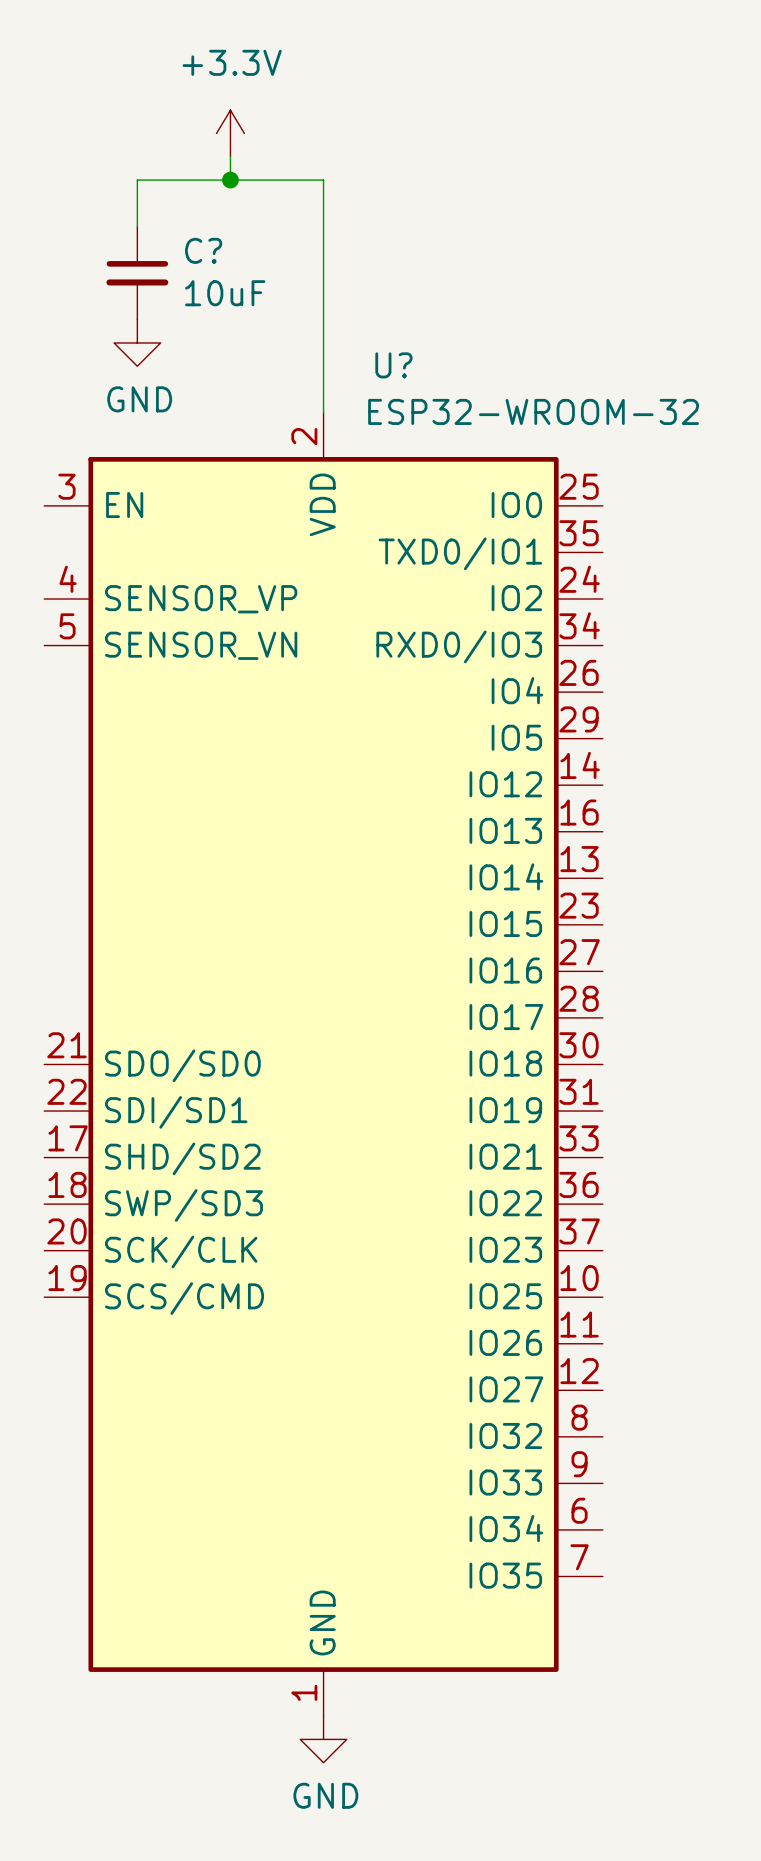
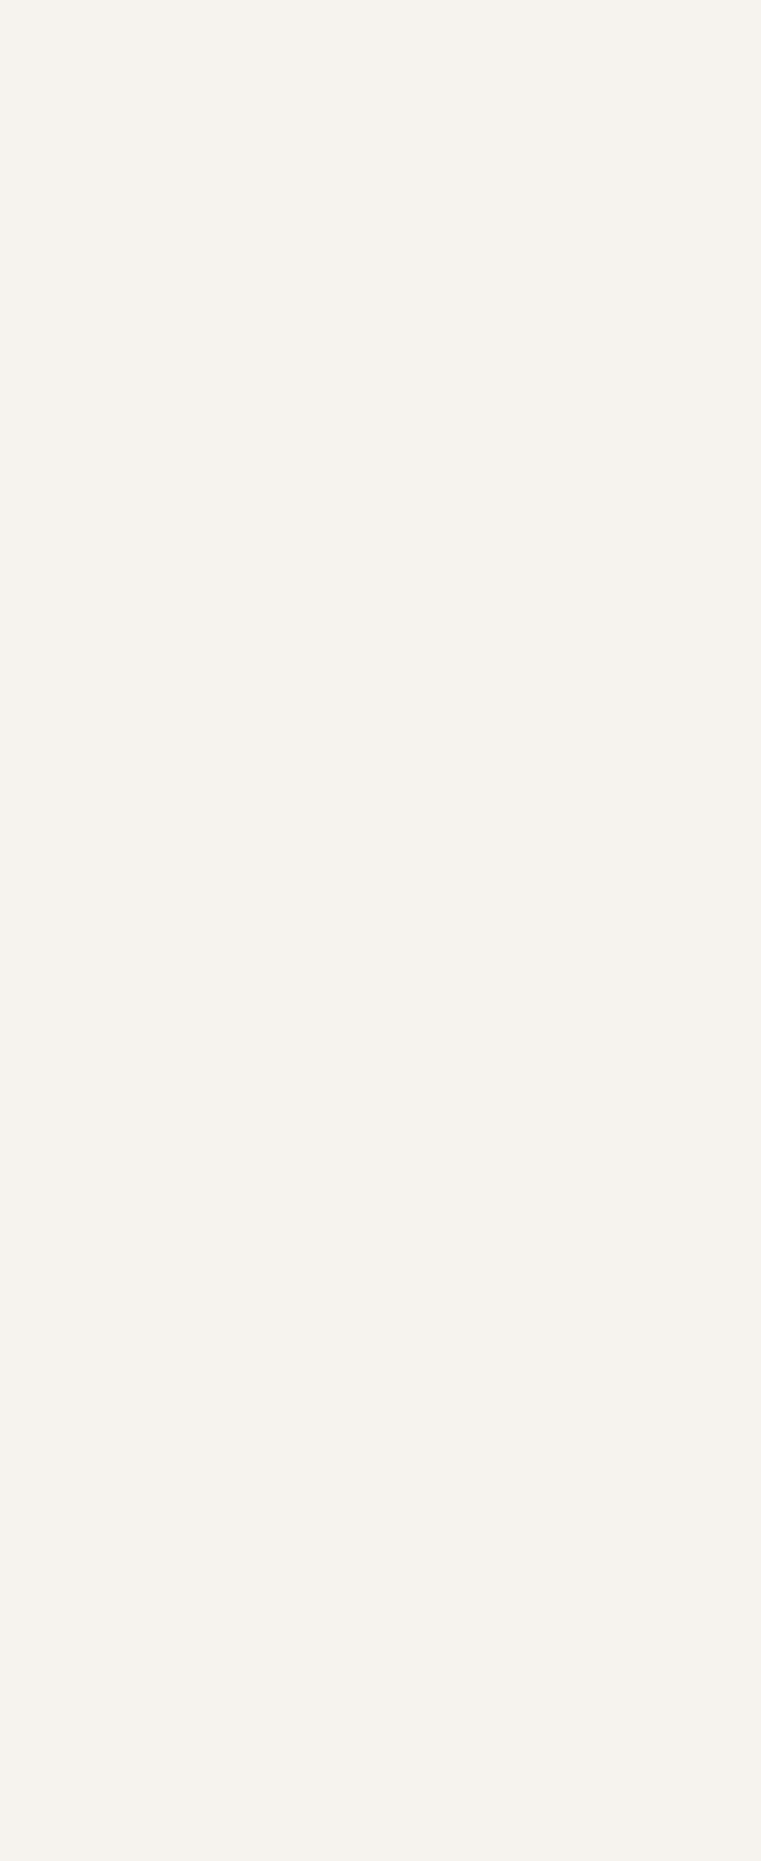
power symbol: +3.3V (230, 133) -> none
wire: (230, 156) (230, 180) -> none
junction: (230, 180) -> none
wire: (137, 226) (137, 180) (323, 180) (323, 412) -> none
C?: 10uF (137, 273) -> none
power symbol: GND (137, 342) -> none
U?: ESP32-WROOM-32 (323, 1064) -> none
power symbol: GND (323, 1739) -> none

